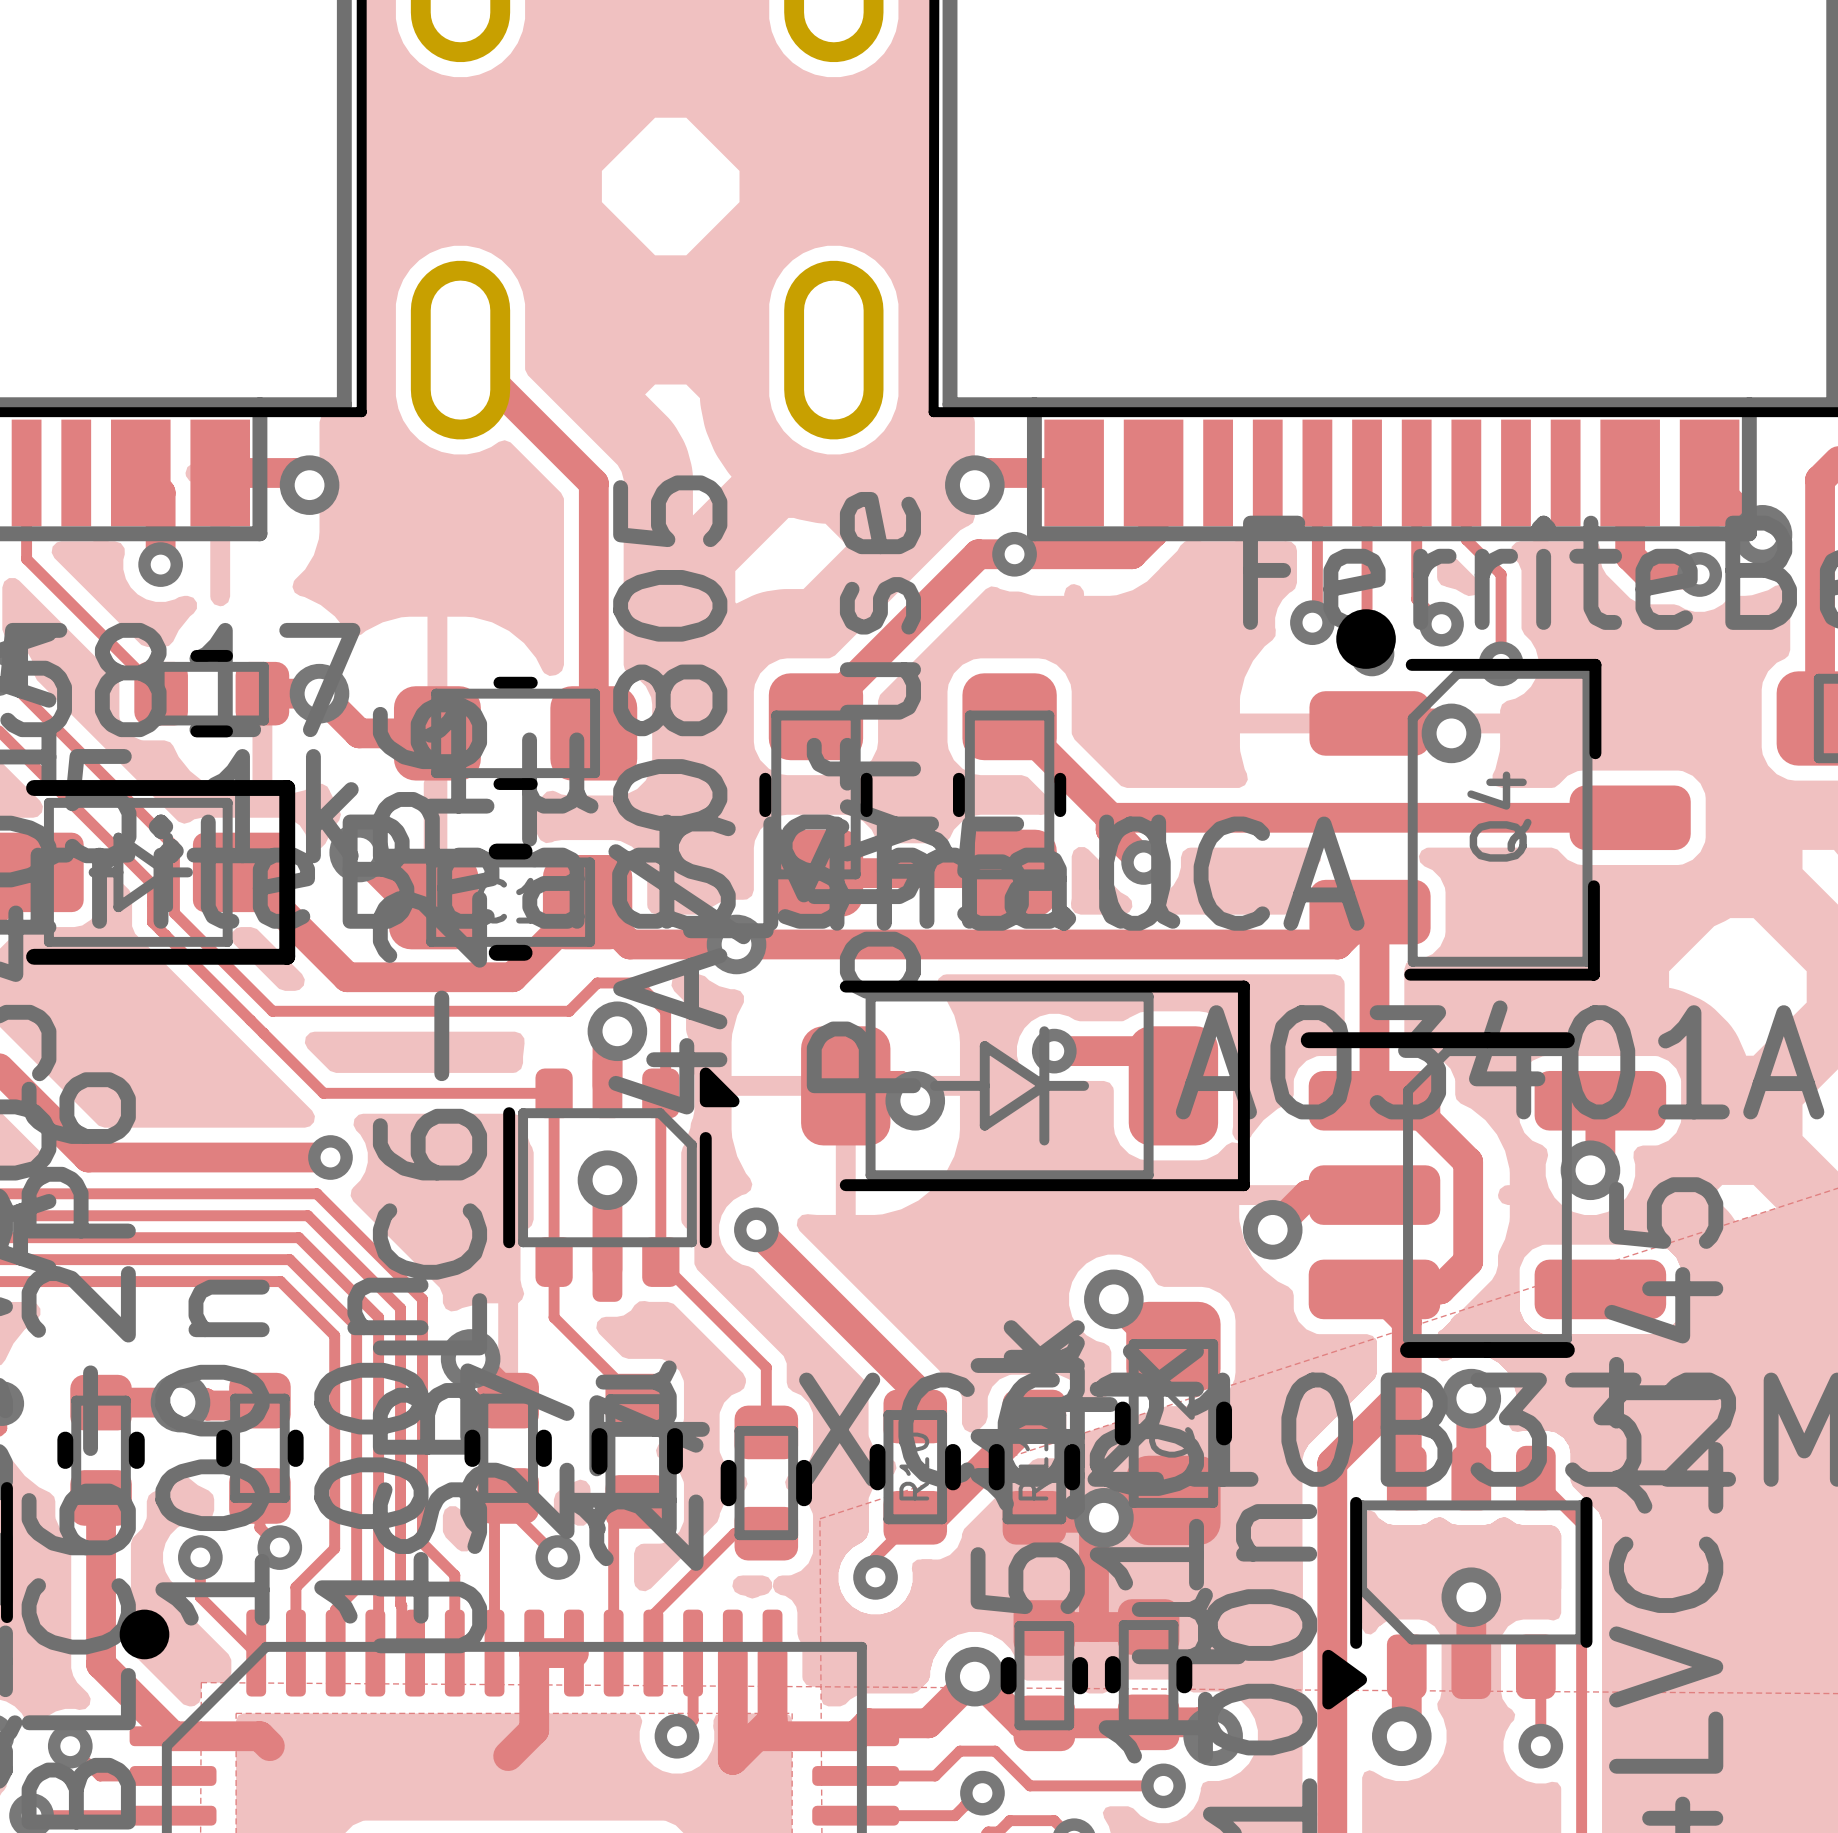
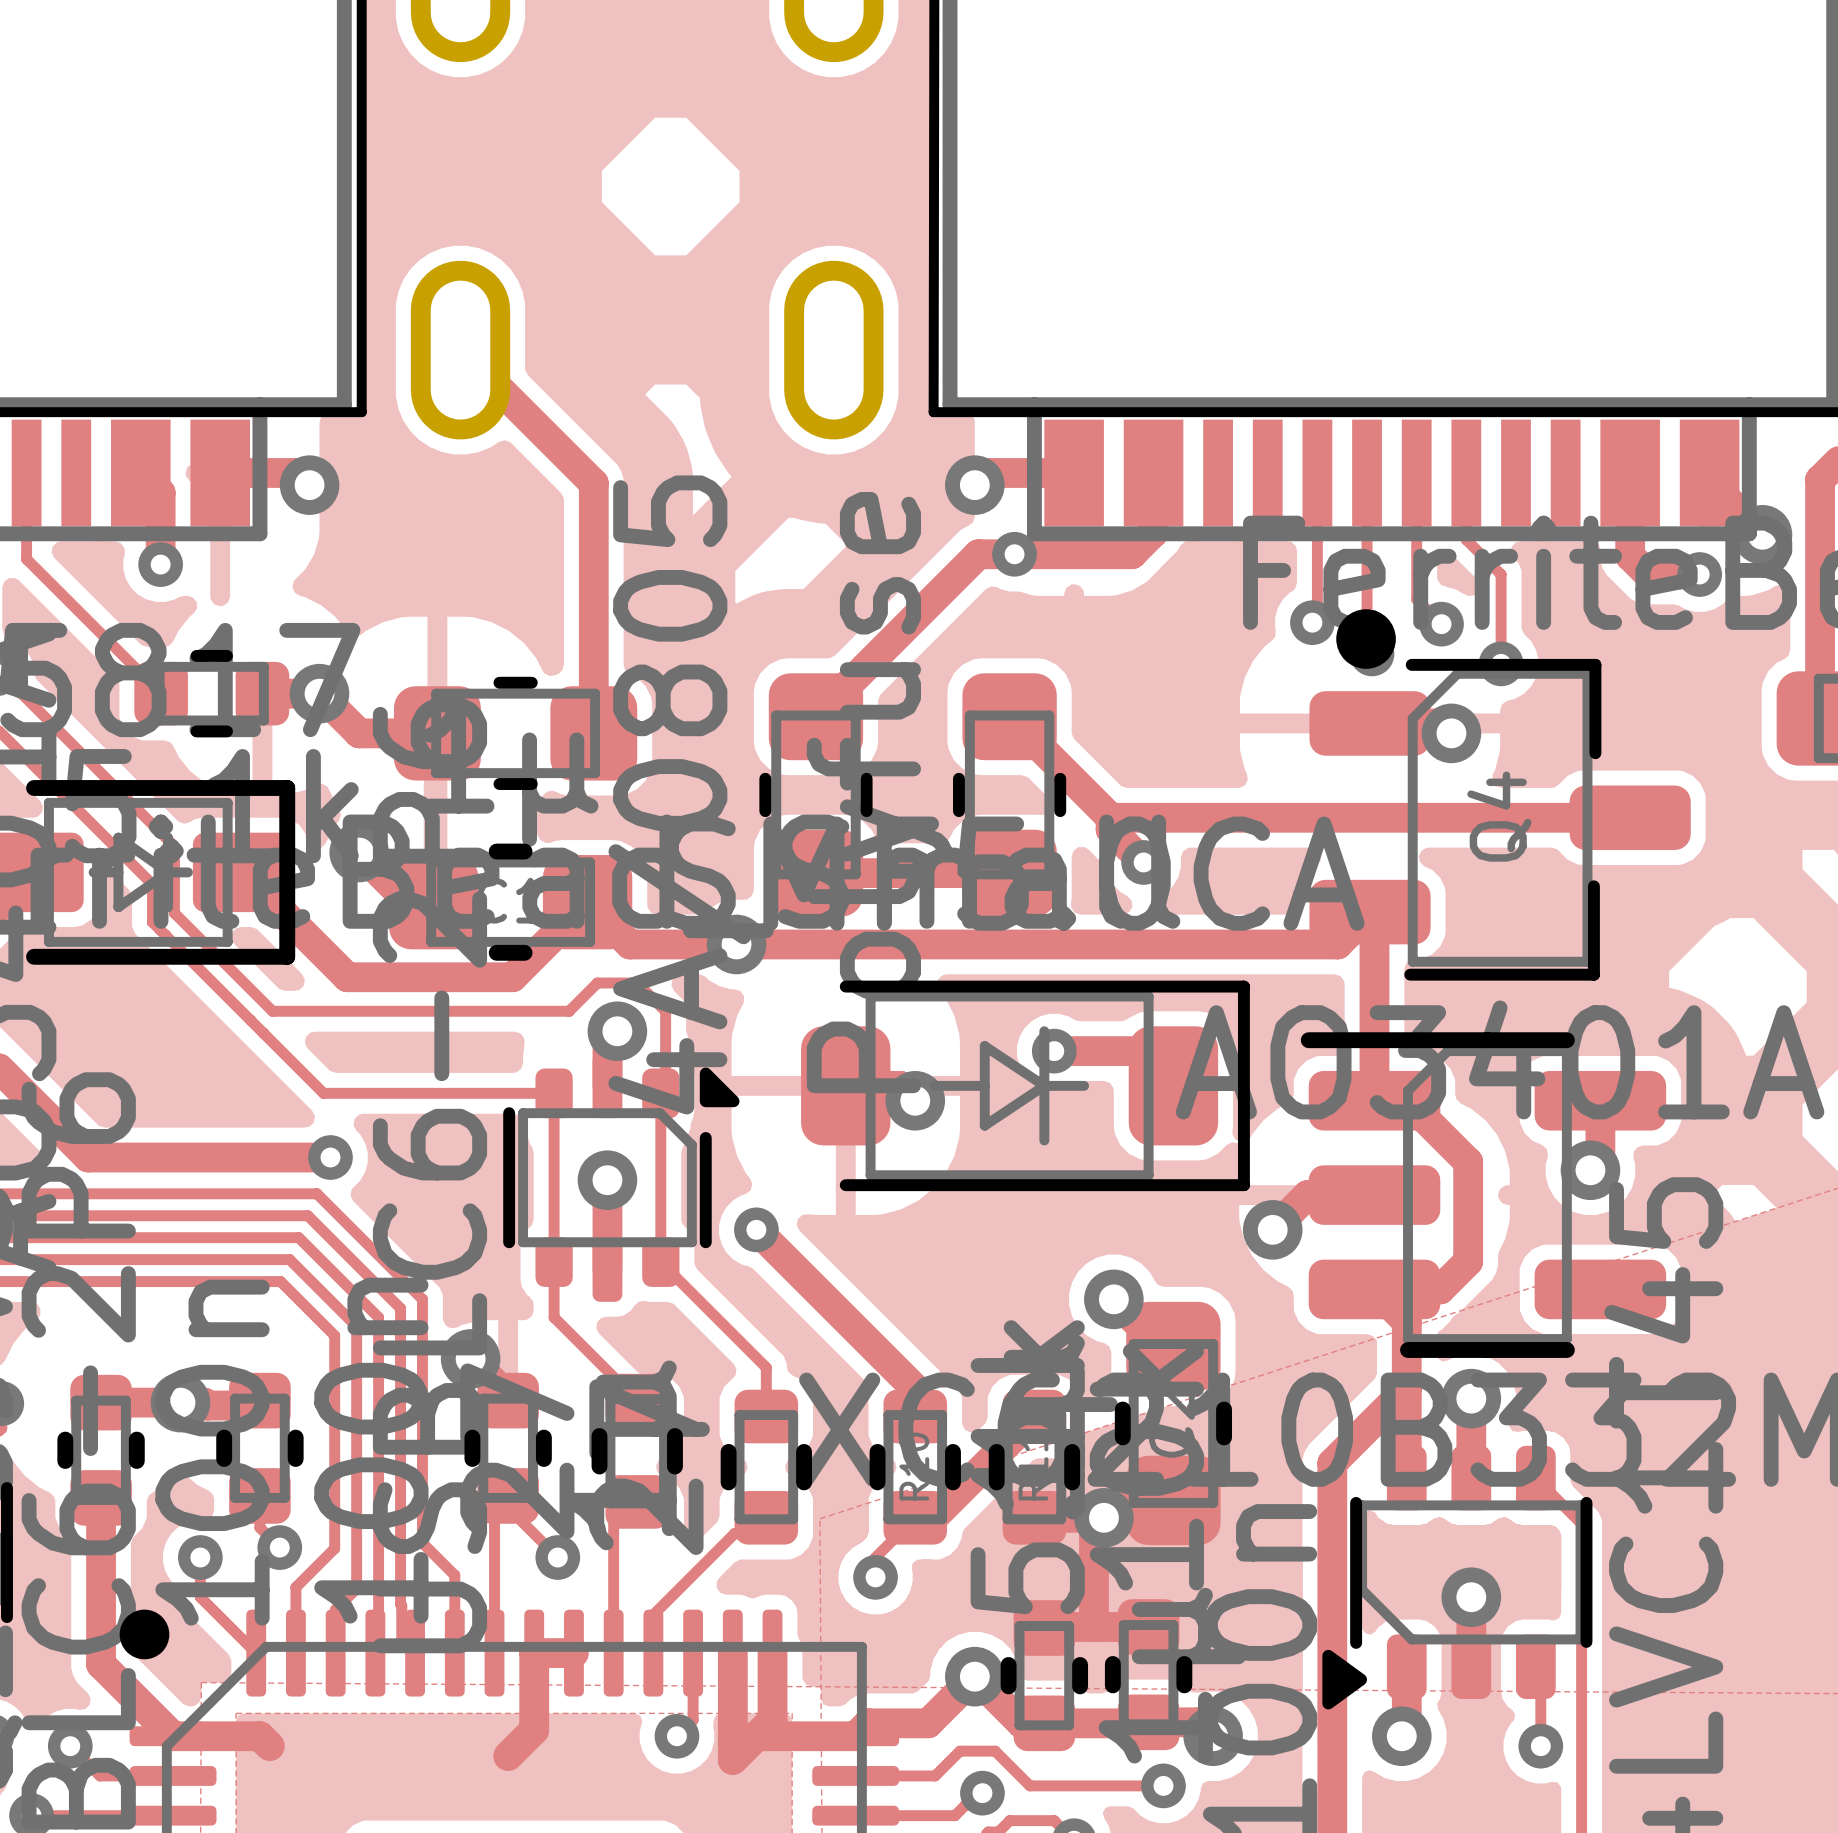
part position: (766, 1483) -> (766, 1467)

